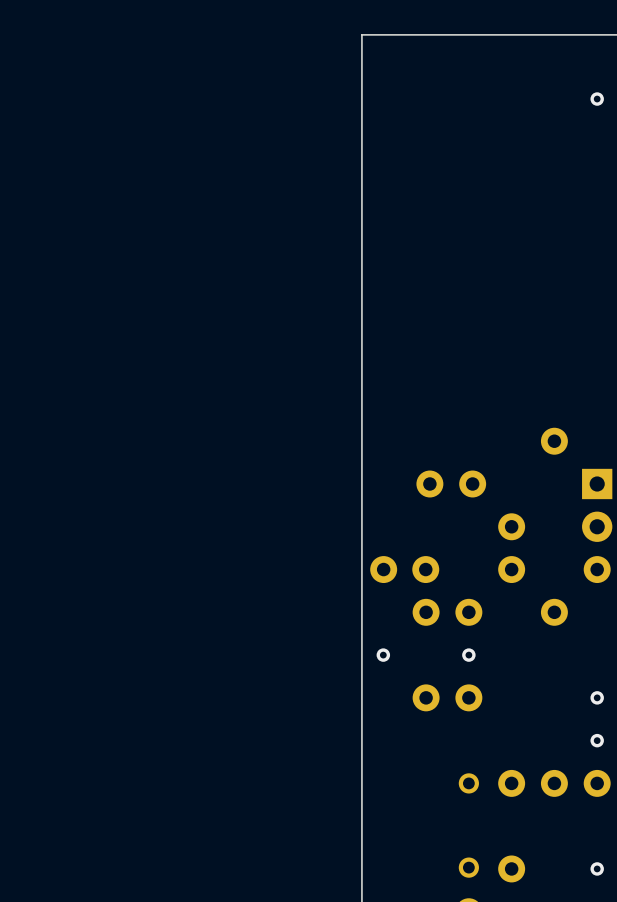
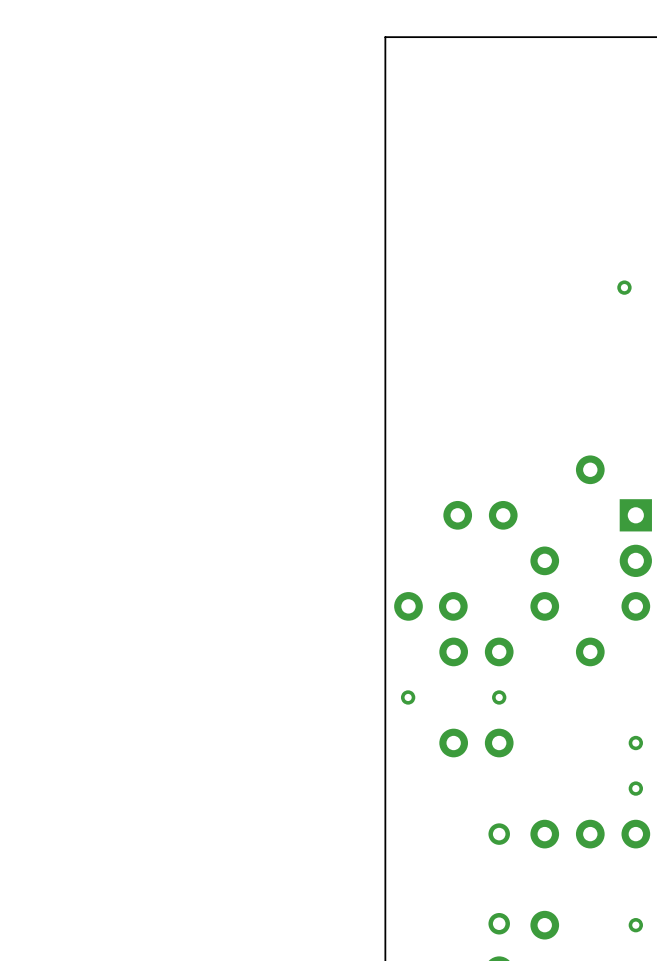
via: (597, 99) -> none
via: none -> (624, 287)

